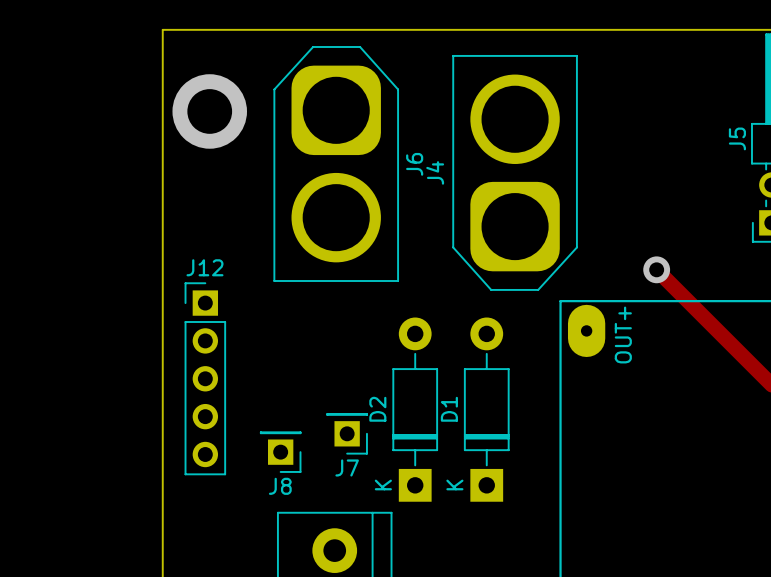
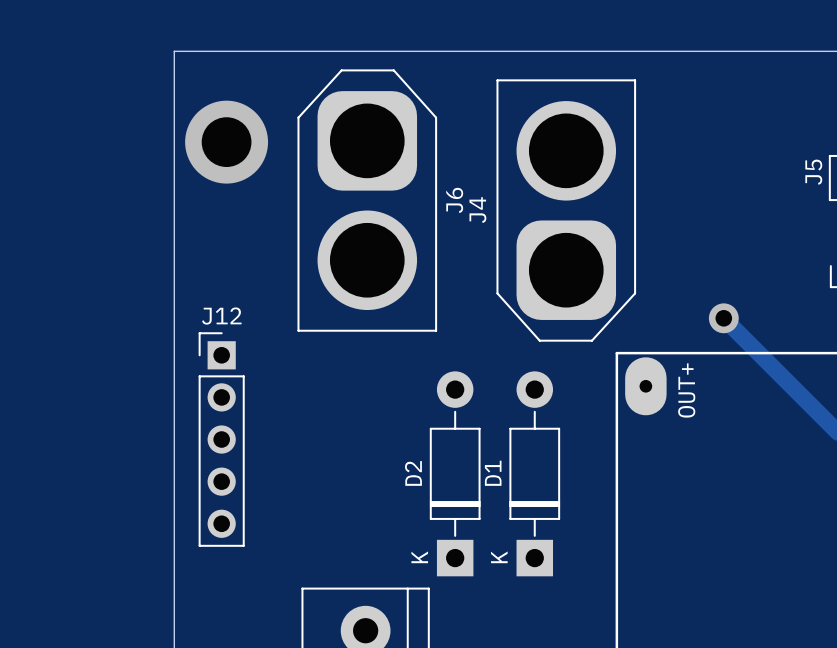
J7: (347, 433) -> none
J8: (280, 452) -> none

